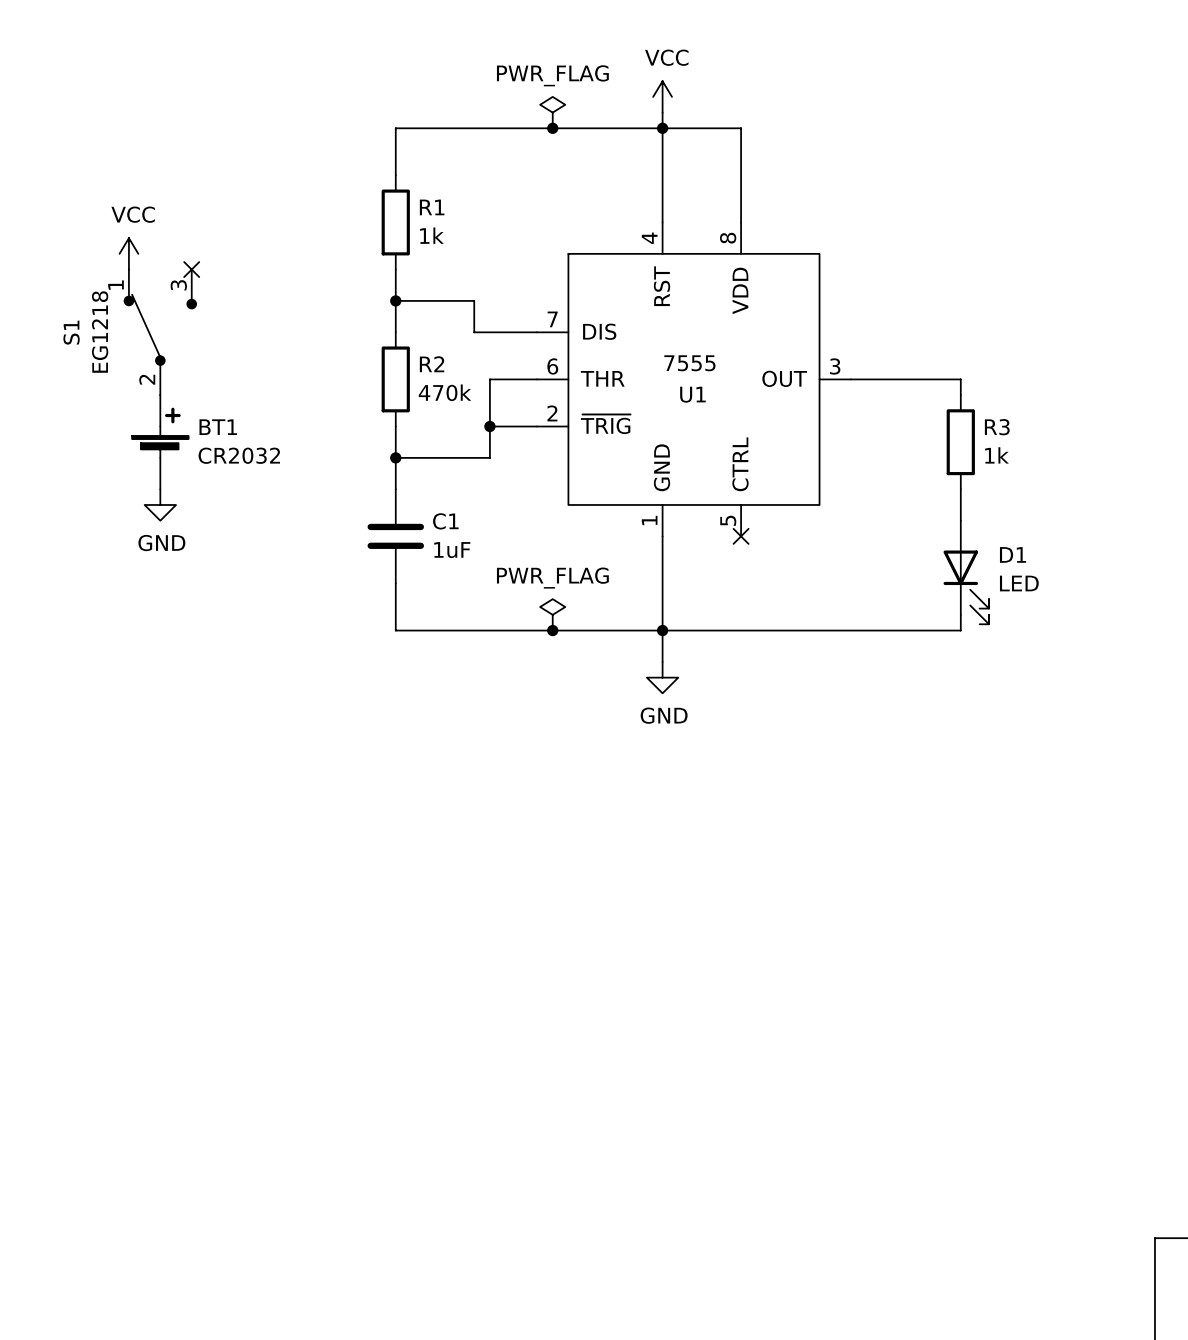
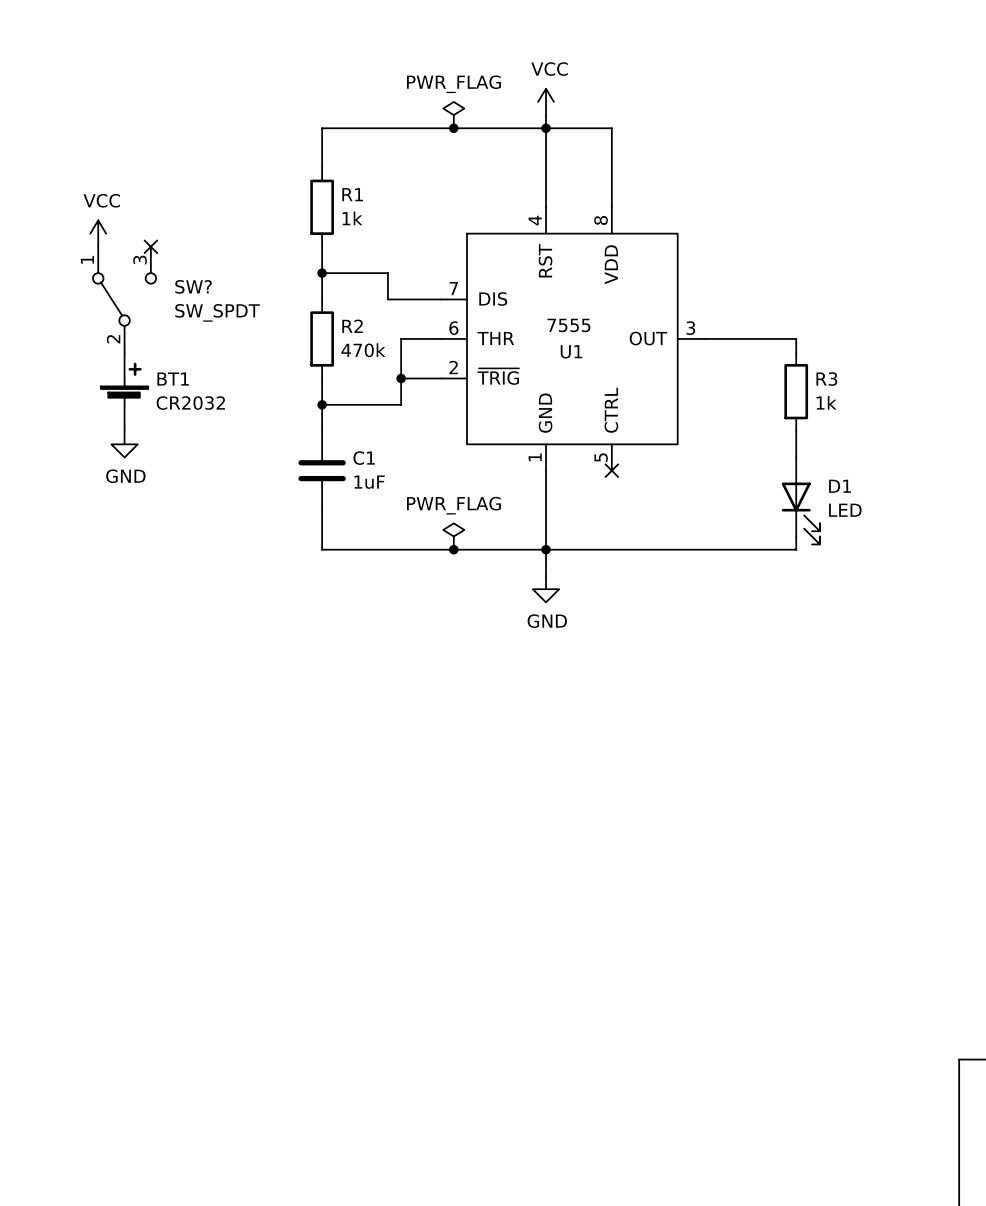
S1: EG1218 (160, 332) -> none
SW?: none -> SW_SPDT (124, 299)

